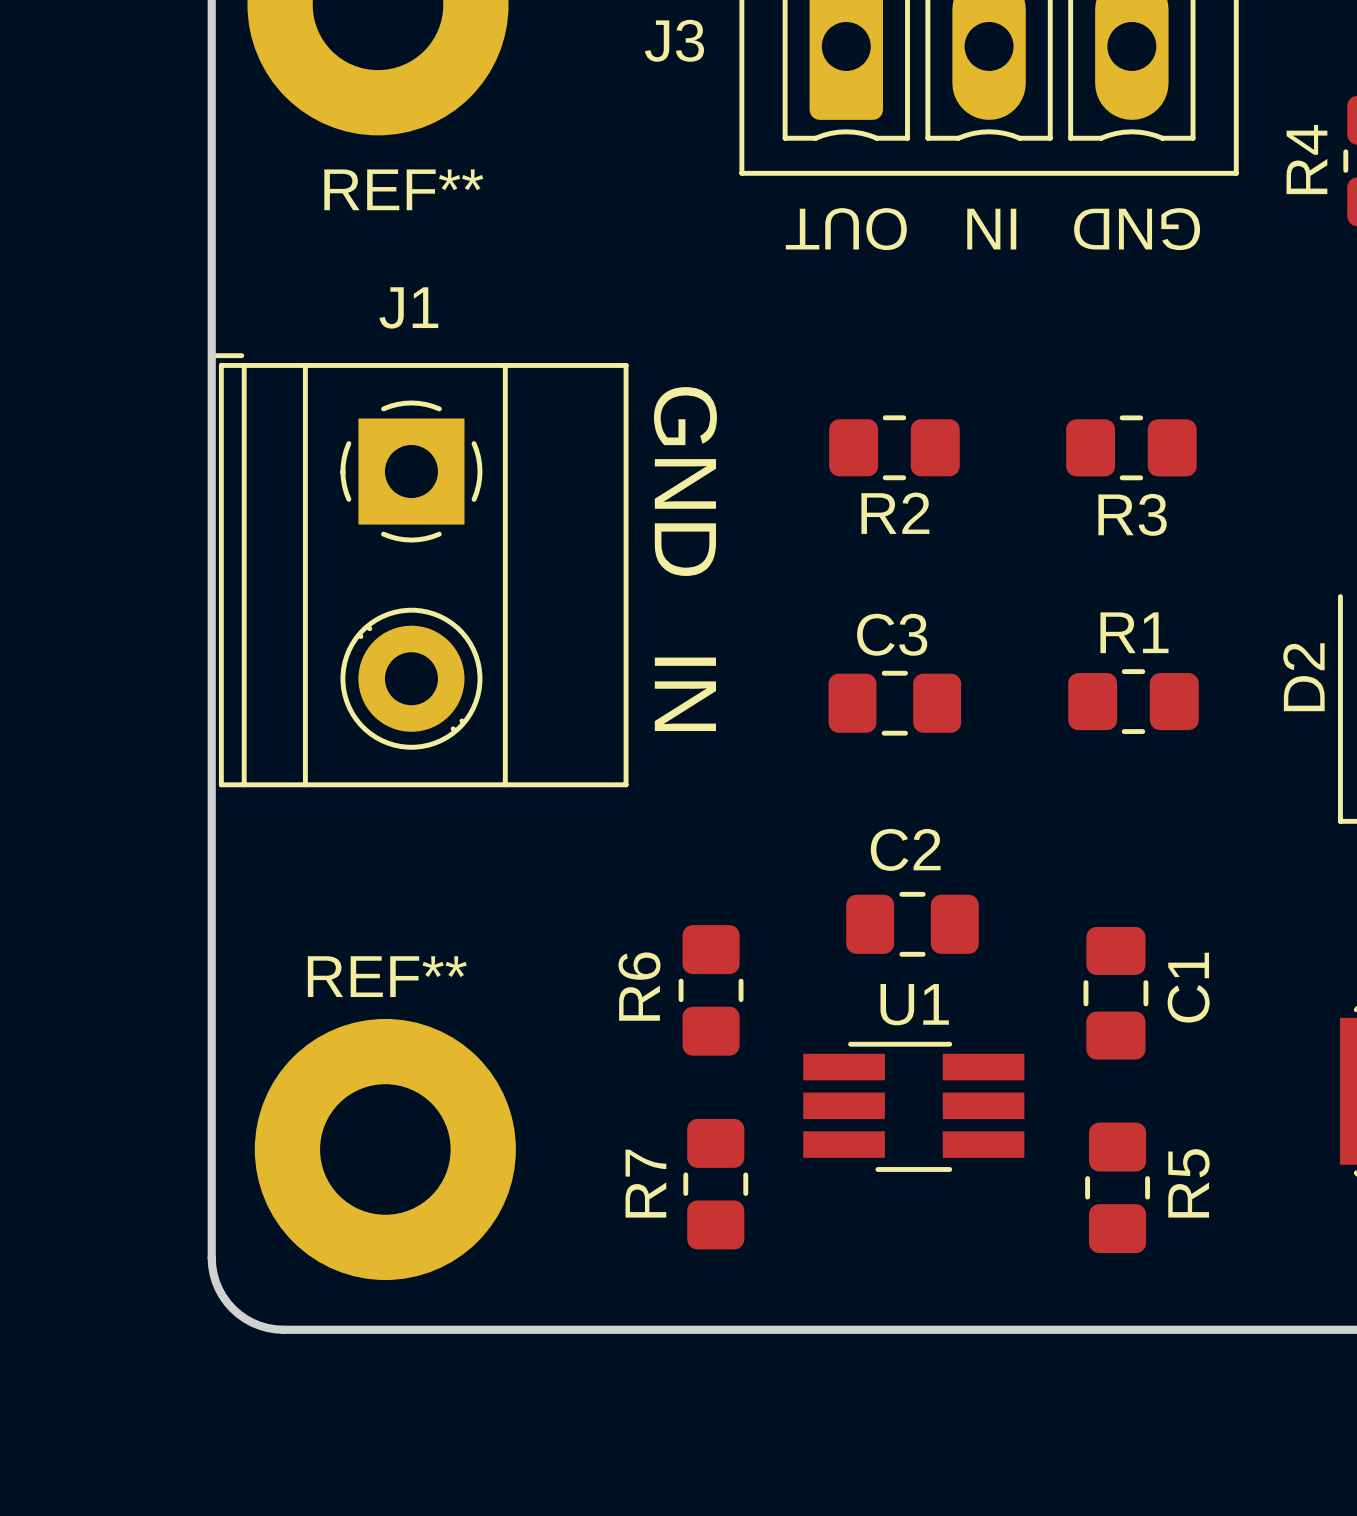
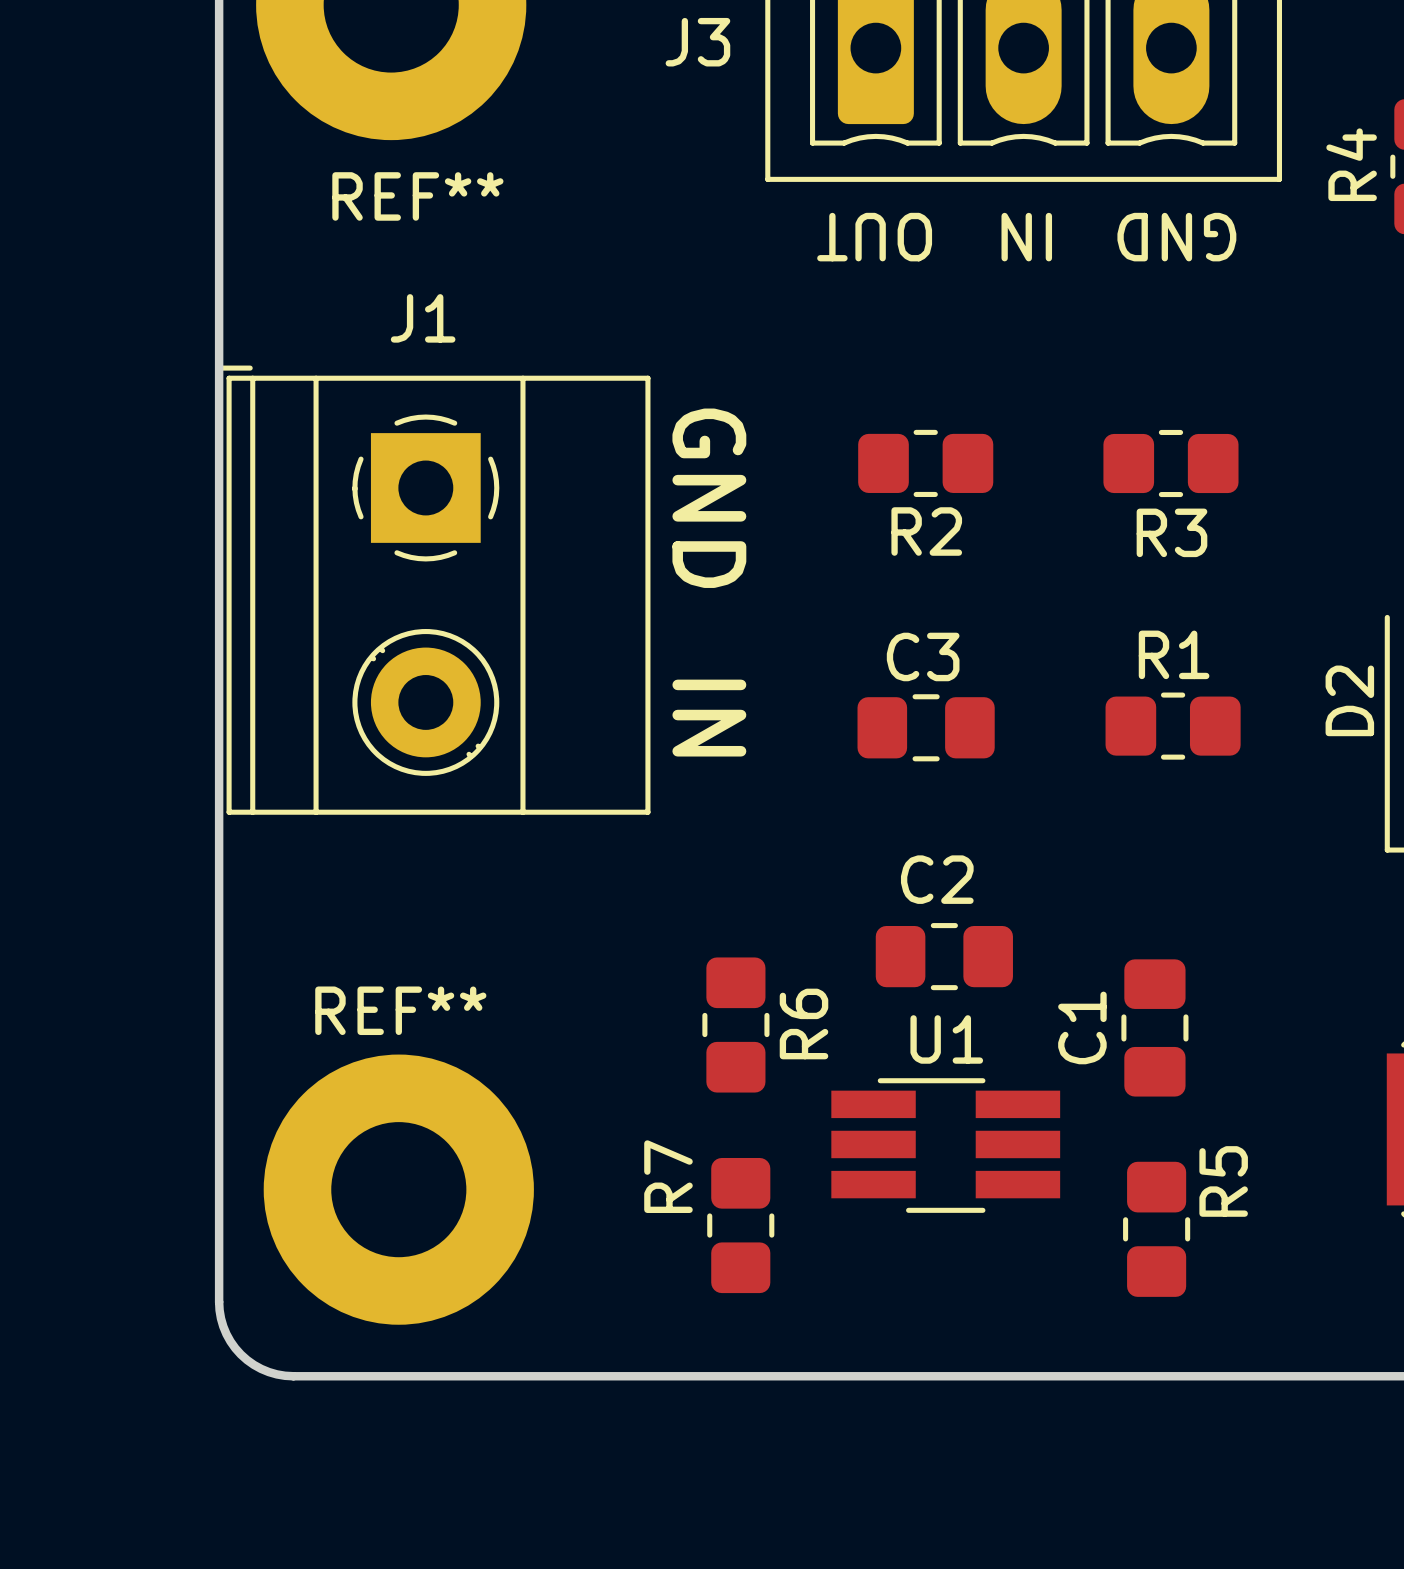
R6 name position: R6 (639, 986) -> R6 (804, 1023)
C1 name position: C1 (1188, 987) -> C1 (1082, 1027)
R7 name position: R7 (645, 1183) -> R7 (668, 1176)
R5 name position: R5 (1188, 1183) -> R5 (1223, 1181)

